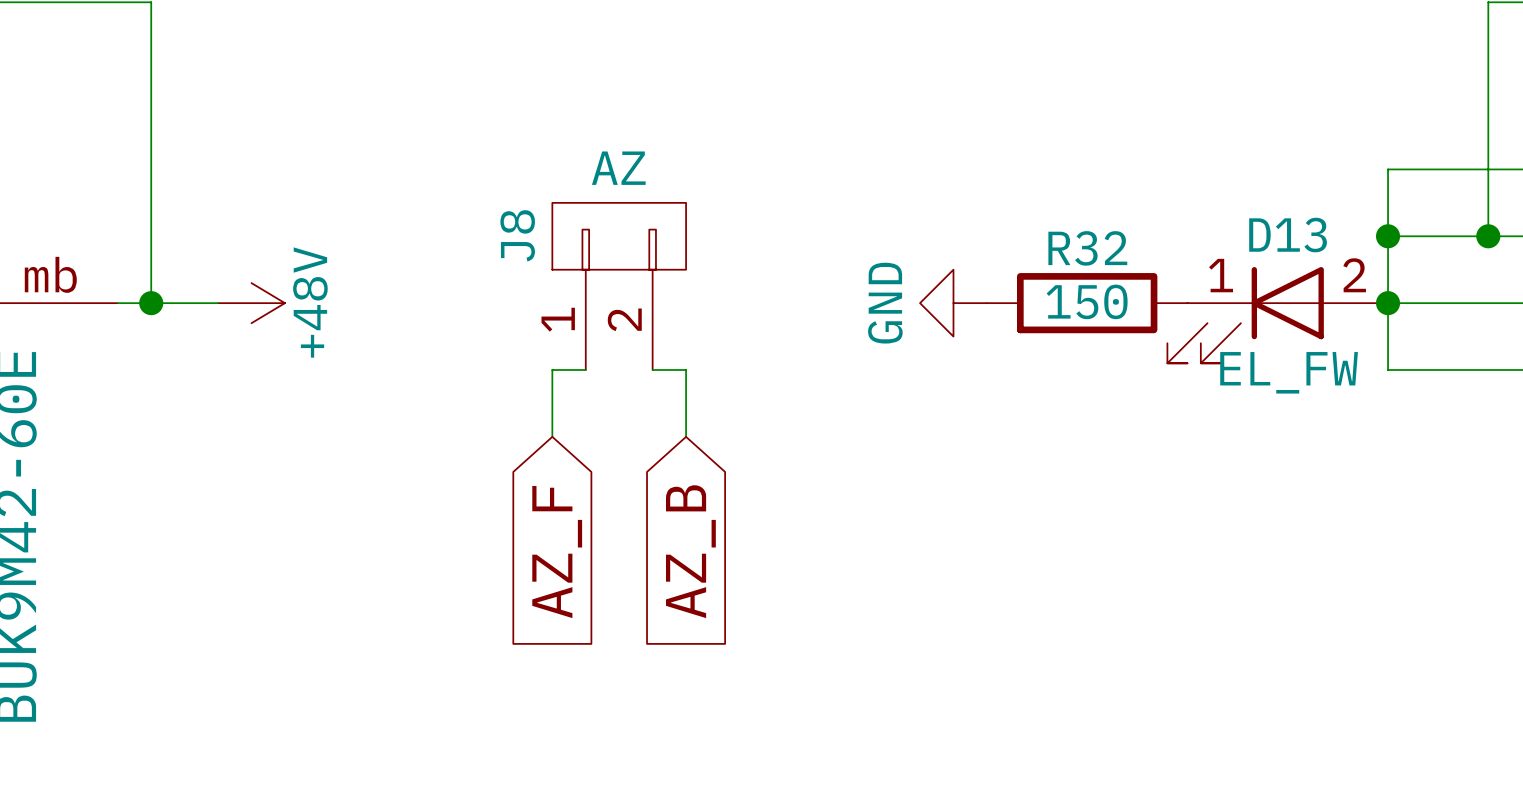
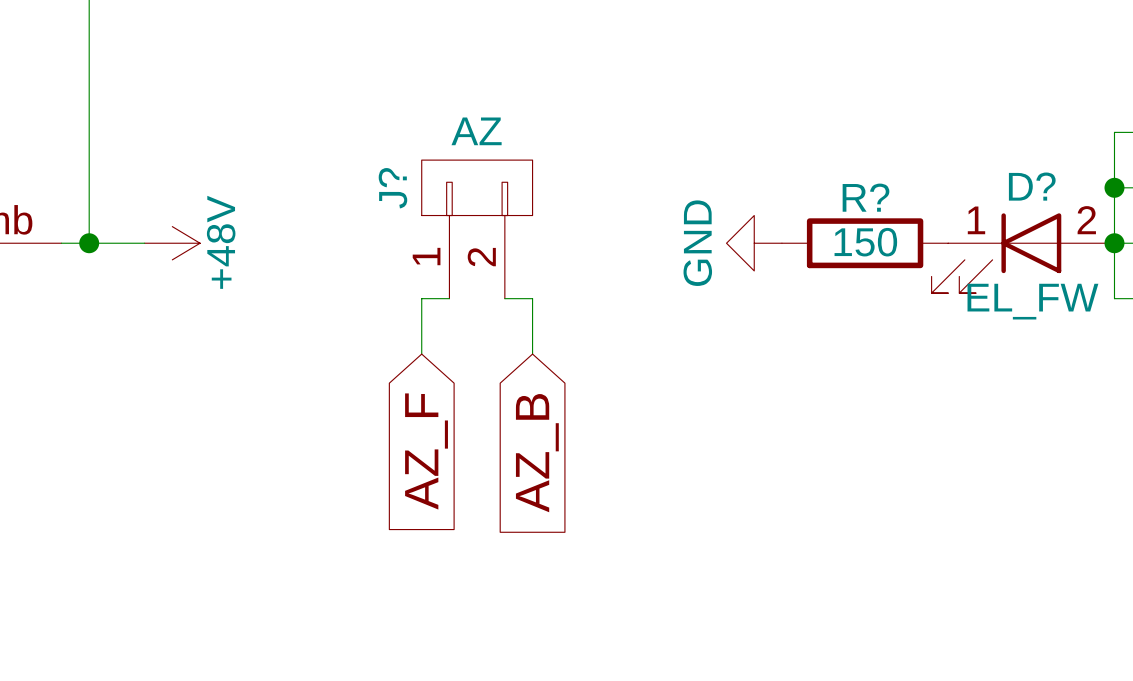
J8 name: J8 (517, 235) -> J? (392, 188)
D13 name: D13 (1288, 235) -> D? (1032, 186)
R32 name: R32 (1087, 248) -> R? (866, 197)

